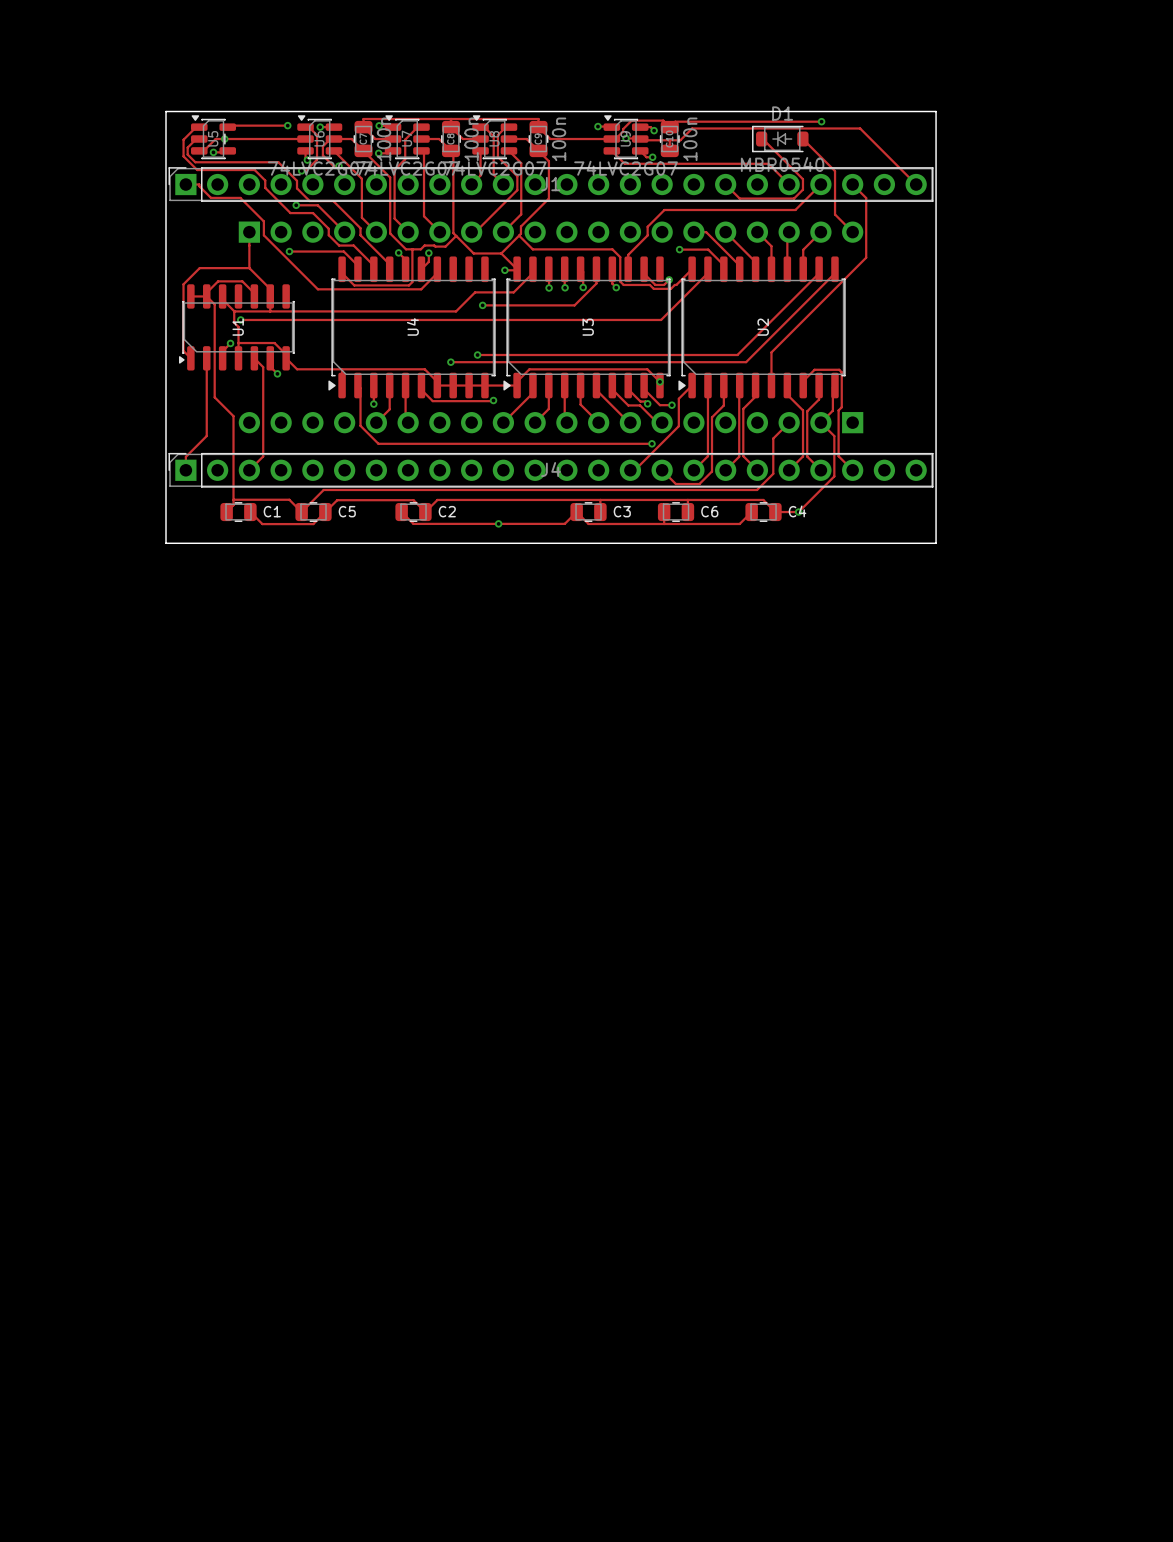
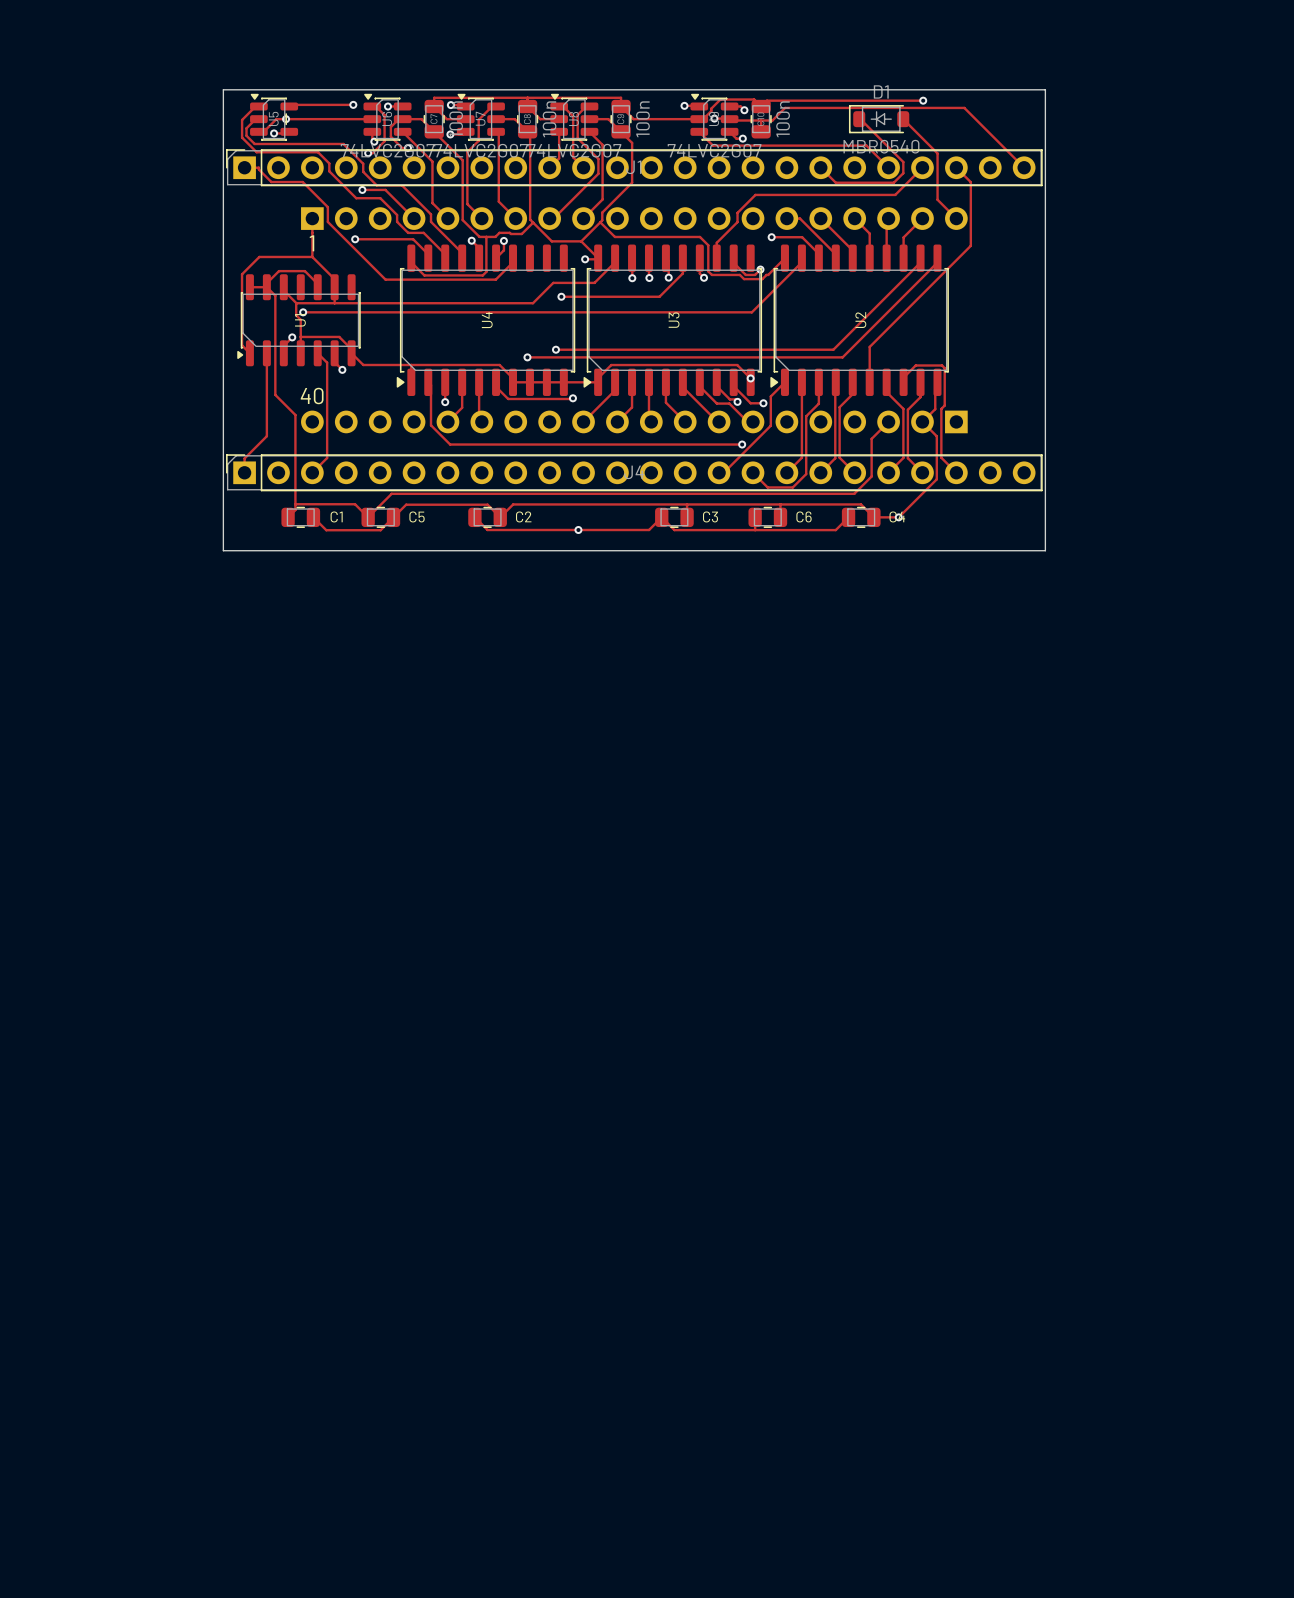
text: none -> 1 (311, 243)
text: none -> 40 (312, 396)

